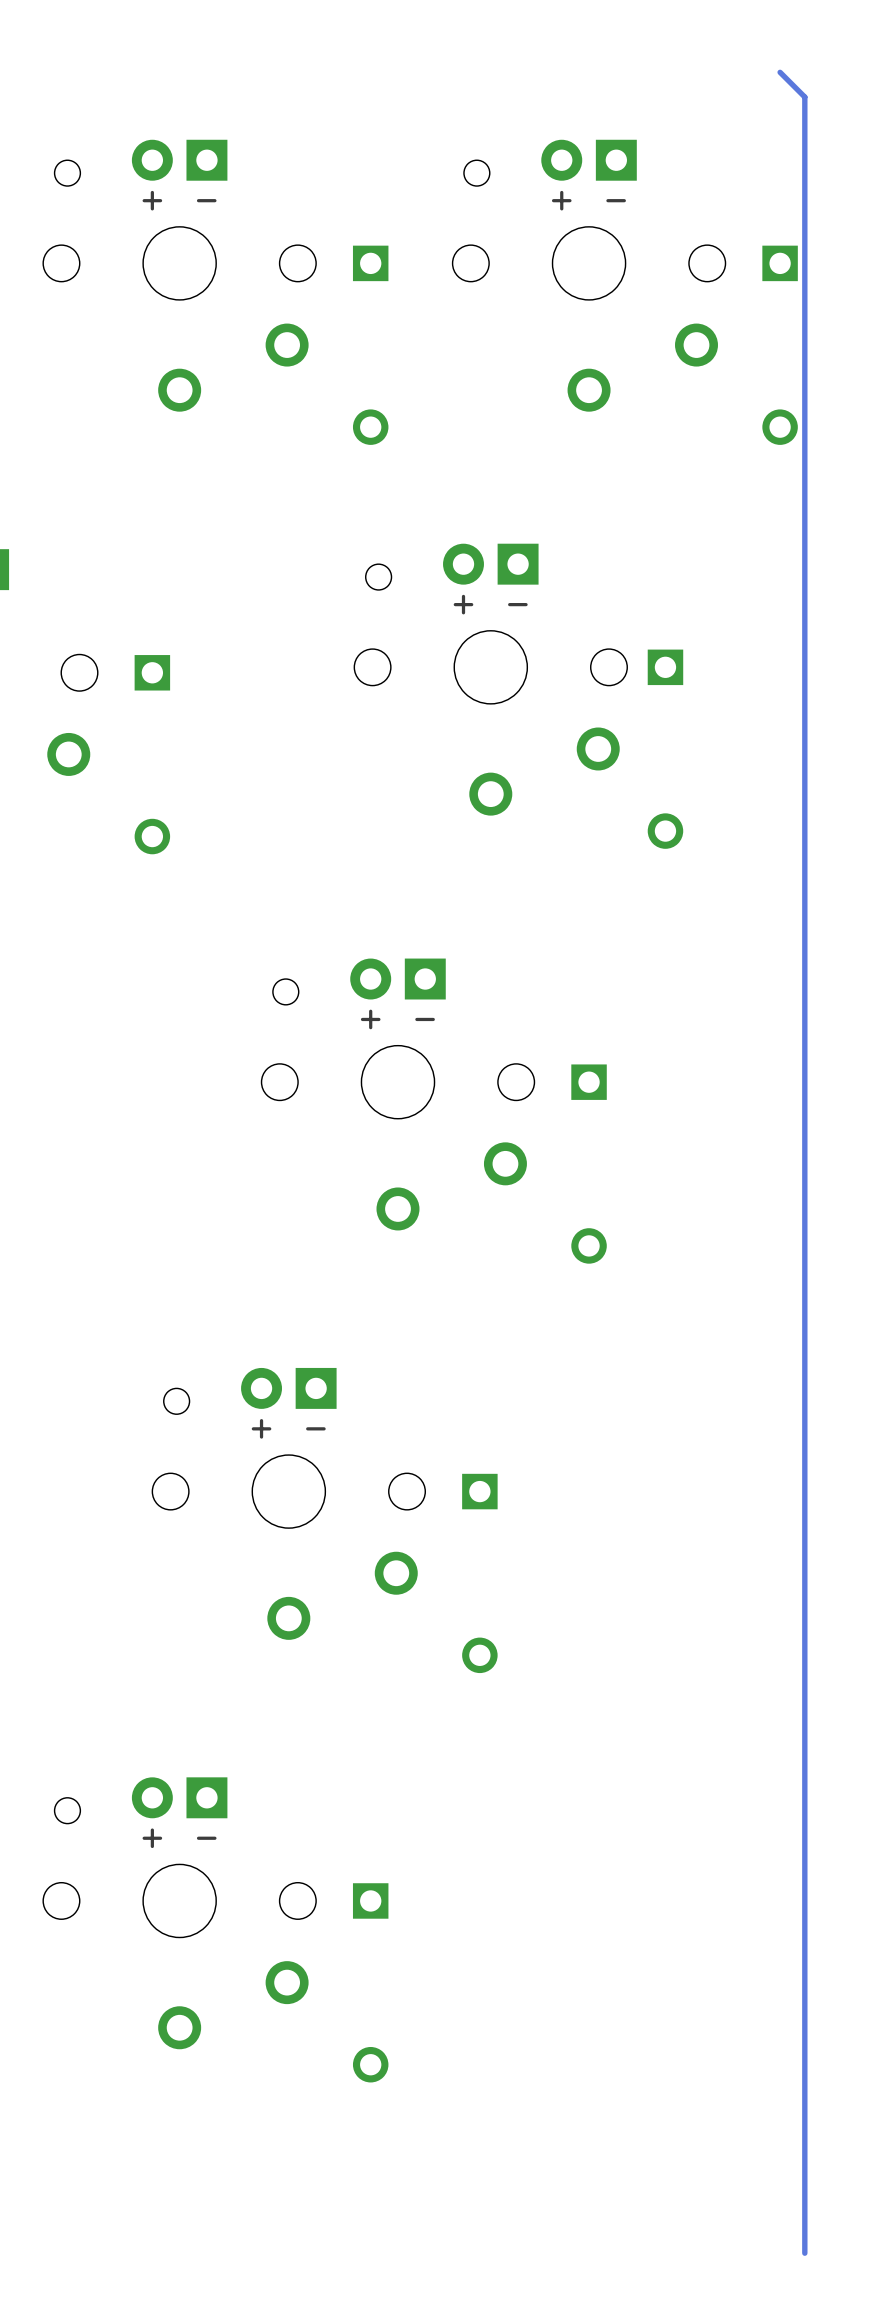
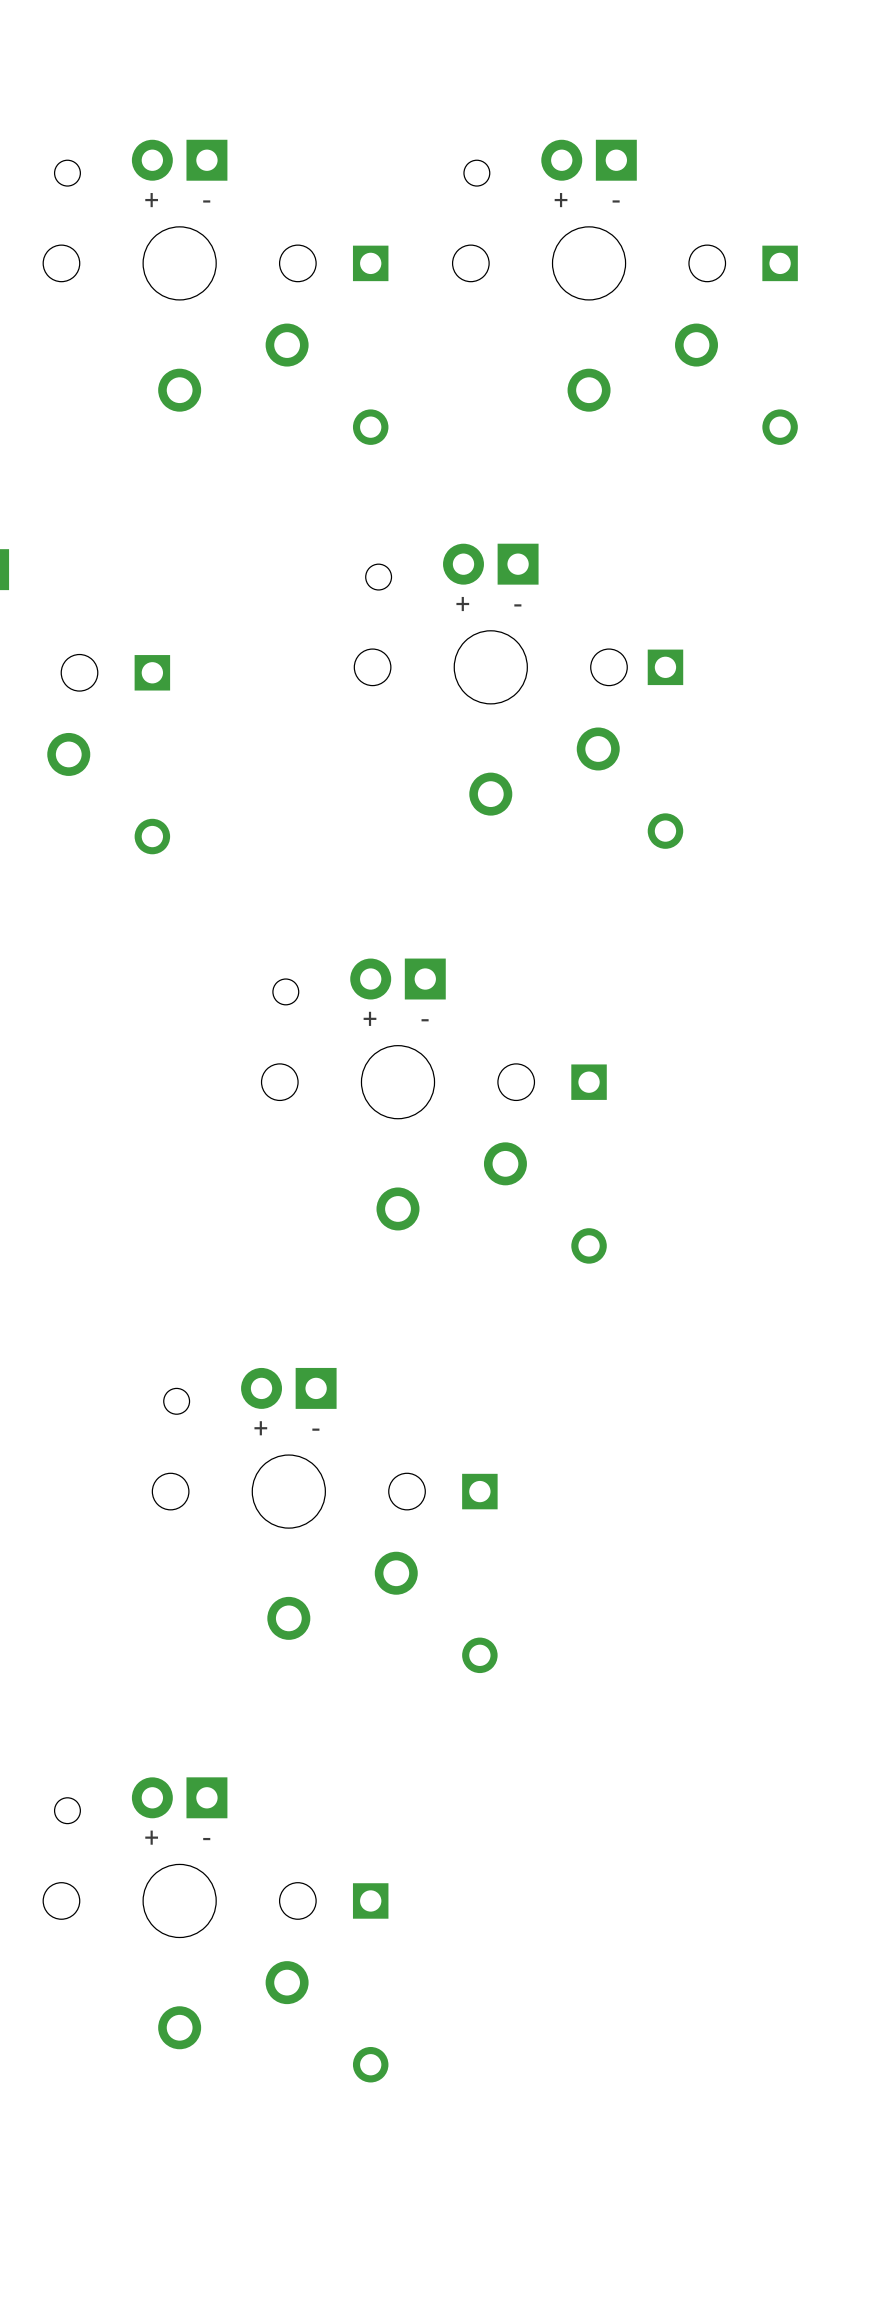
bottom track: (780, 72) (804, 97) (804, 2253) -> none

